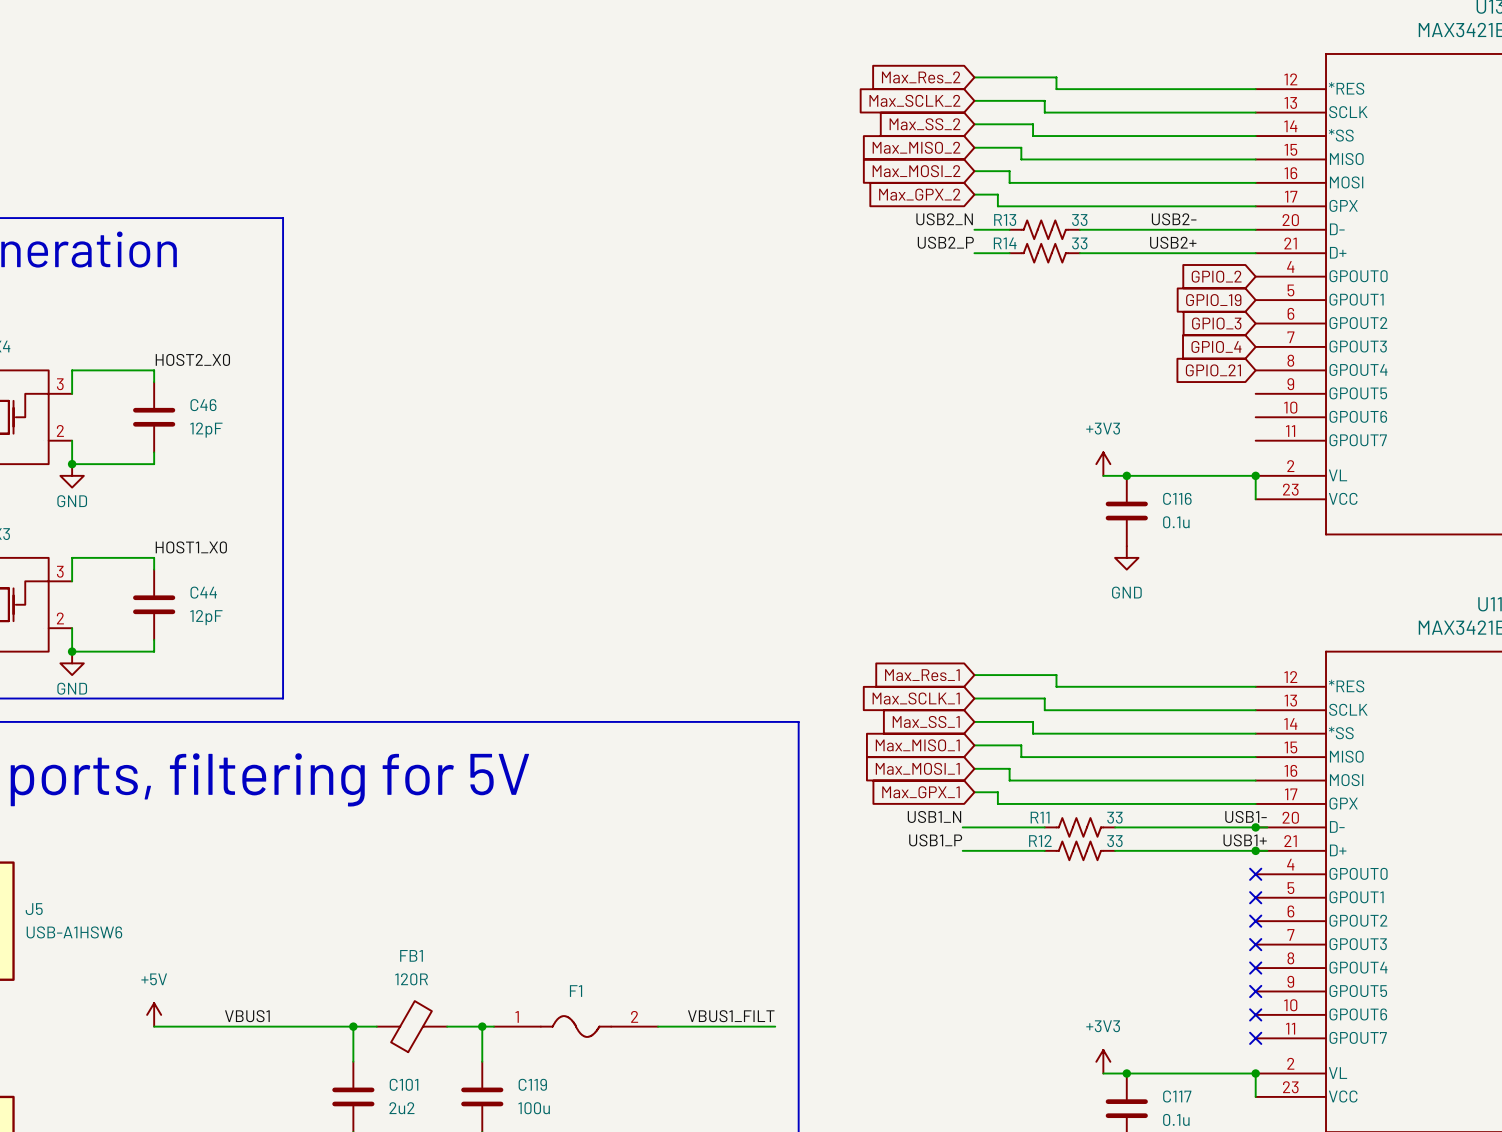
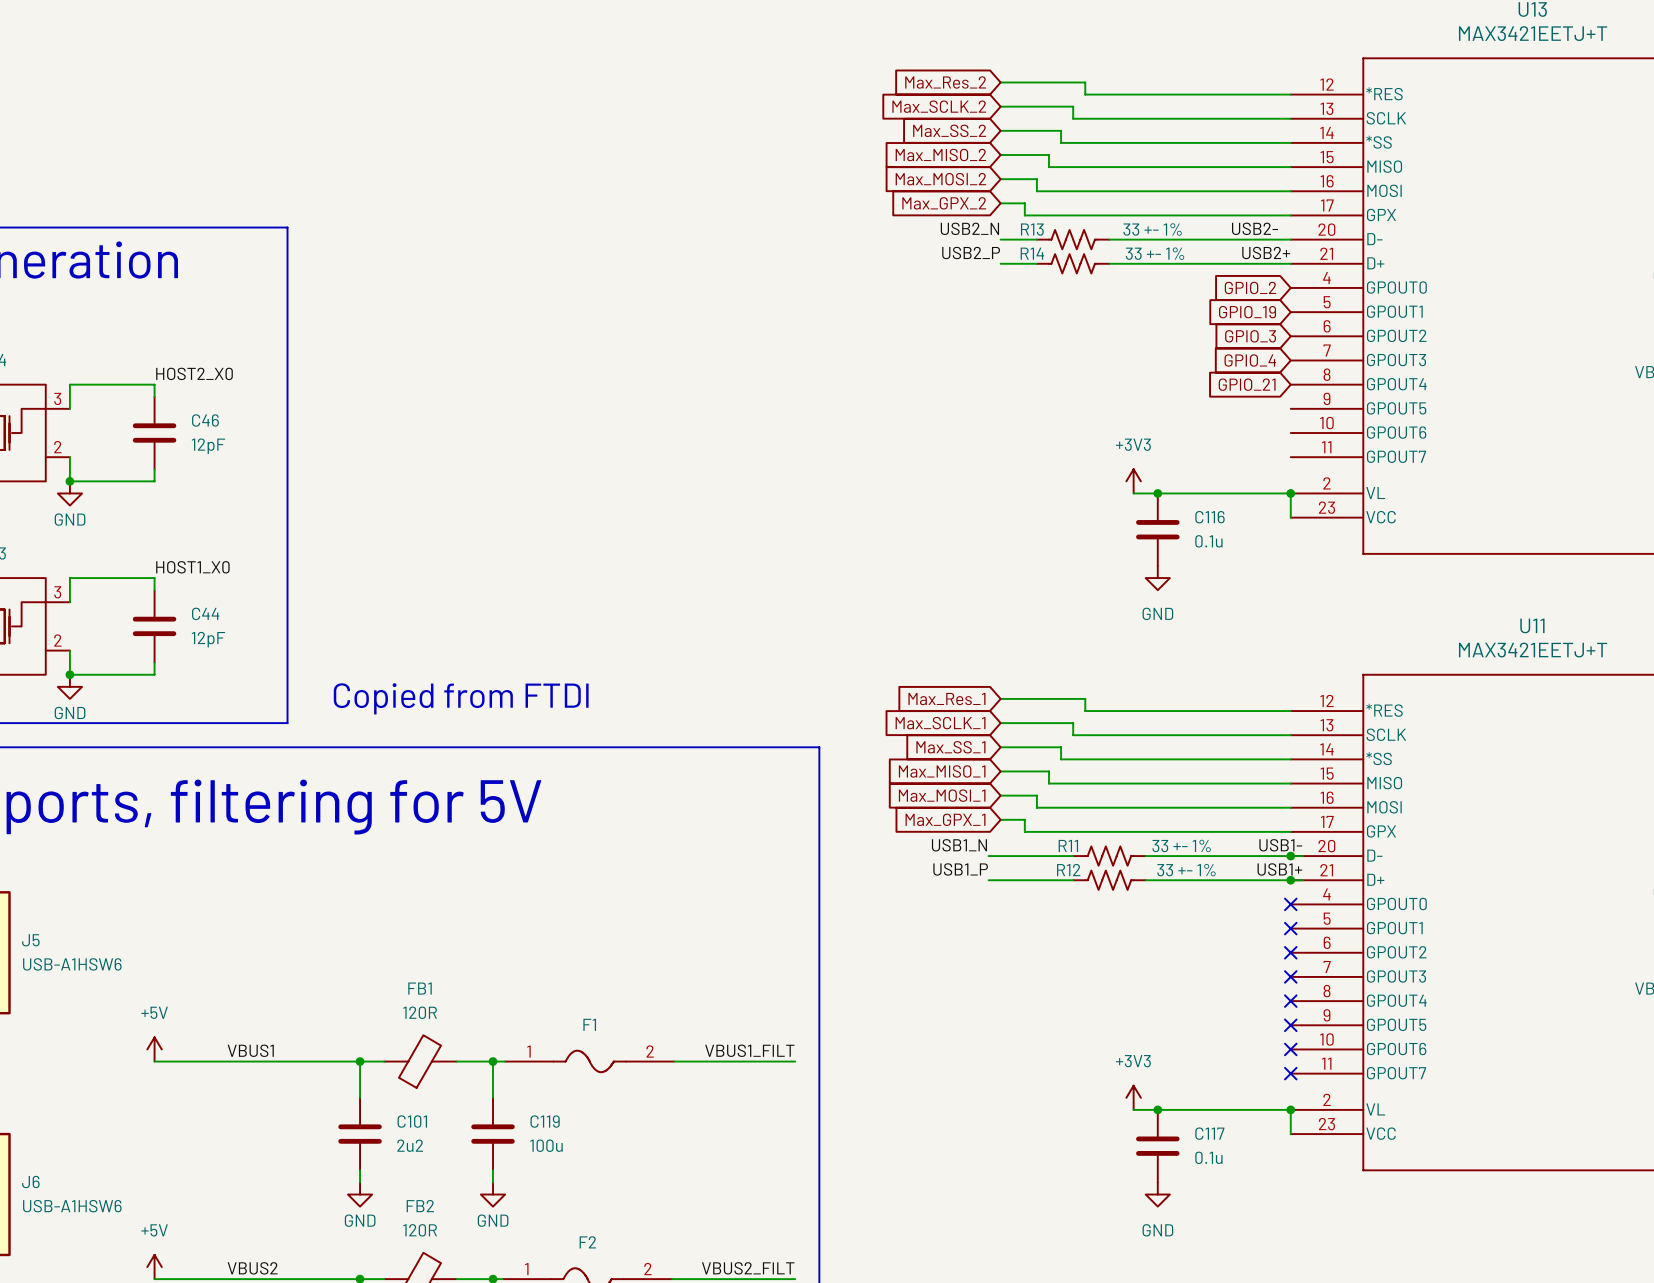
label position: USB2- (1174, 219) -> USB2- (1255, 228)
R13 value: 33 (1079, 220) -> 33 +- 1% (1152, 229)
label position: USB2+ (1173, 242) -> USB2+ (1266, 253)
R14 value: 33 (1079, 243) -> 33 +- 1% (1155, 253)
text: none -> Copied from FTDI (461, 698)
R11 value: 33 (1114, 817) -> 33 +- 1% (1181, 845)
R12 value: 33 (1114, 841) -> 33 +- 1% (1186, 870)

